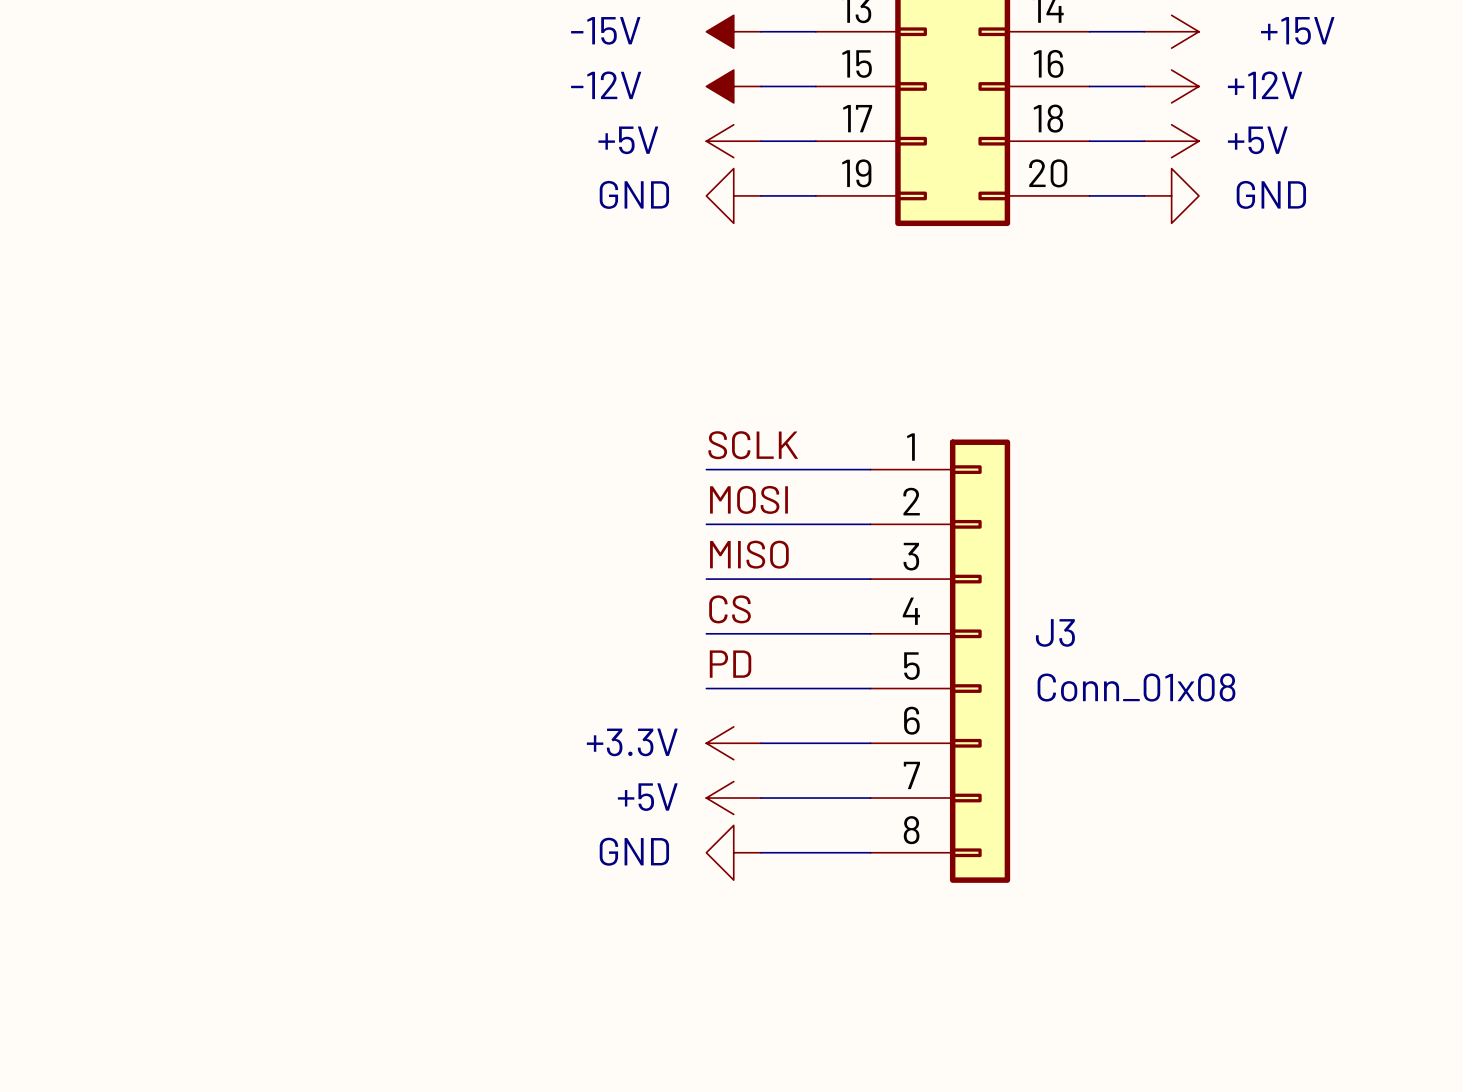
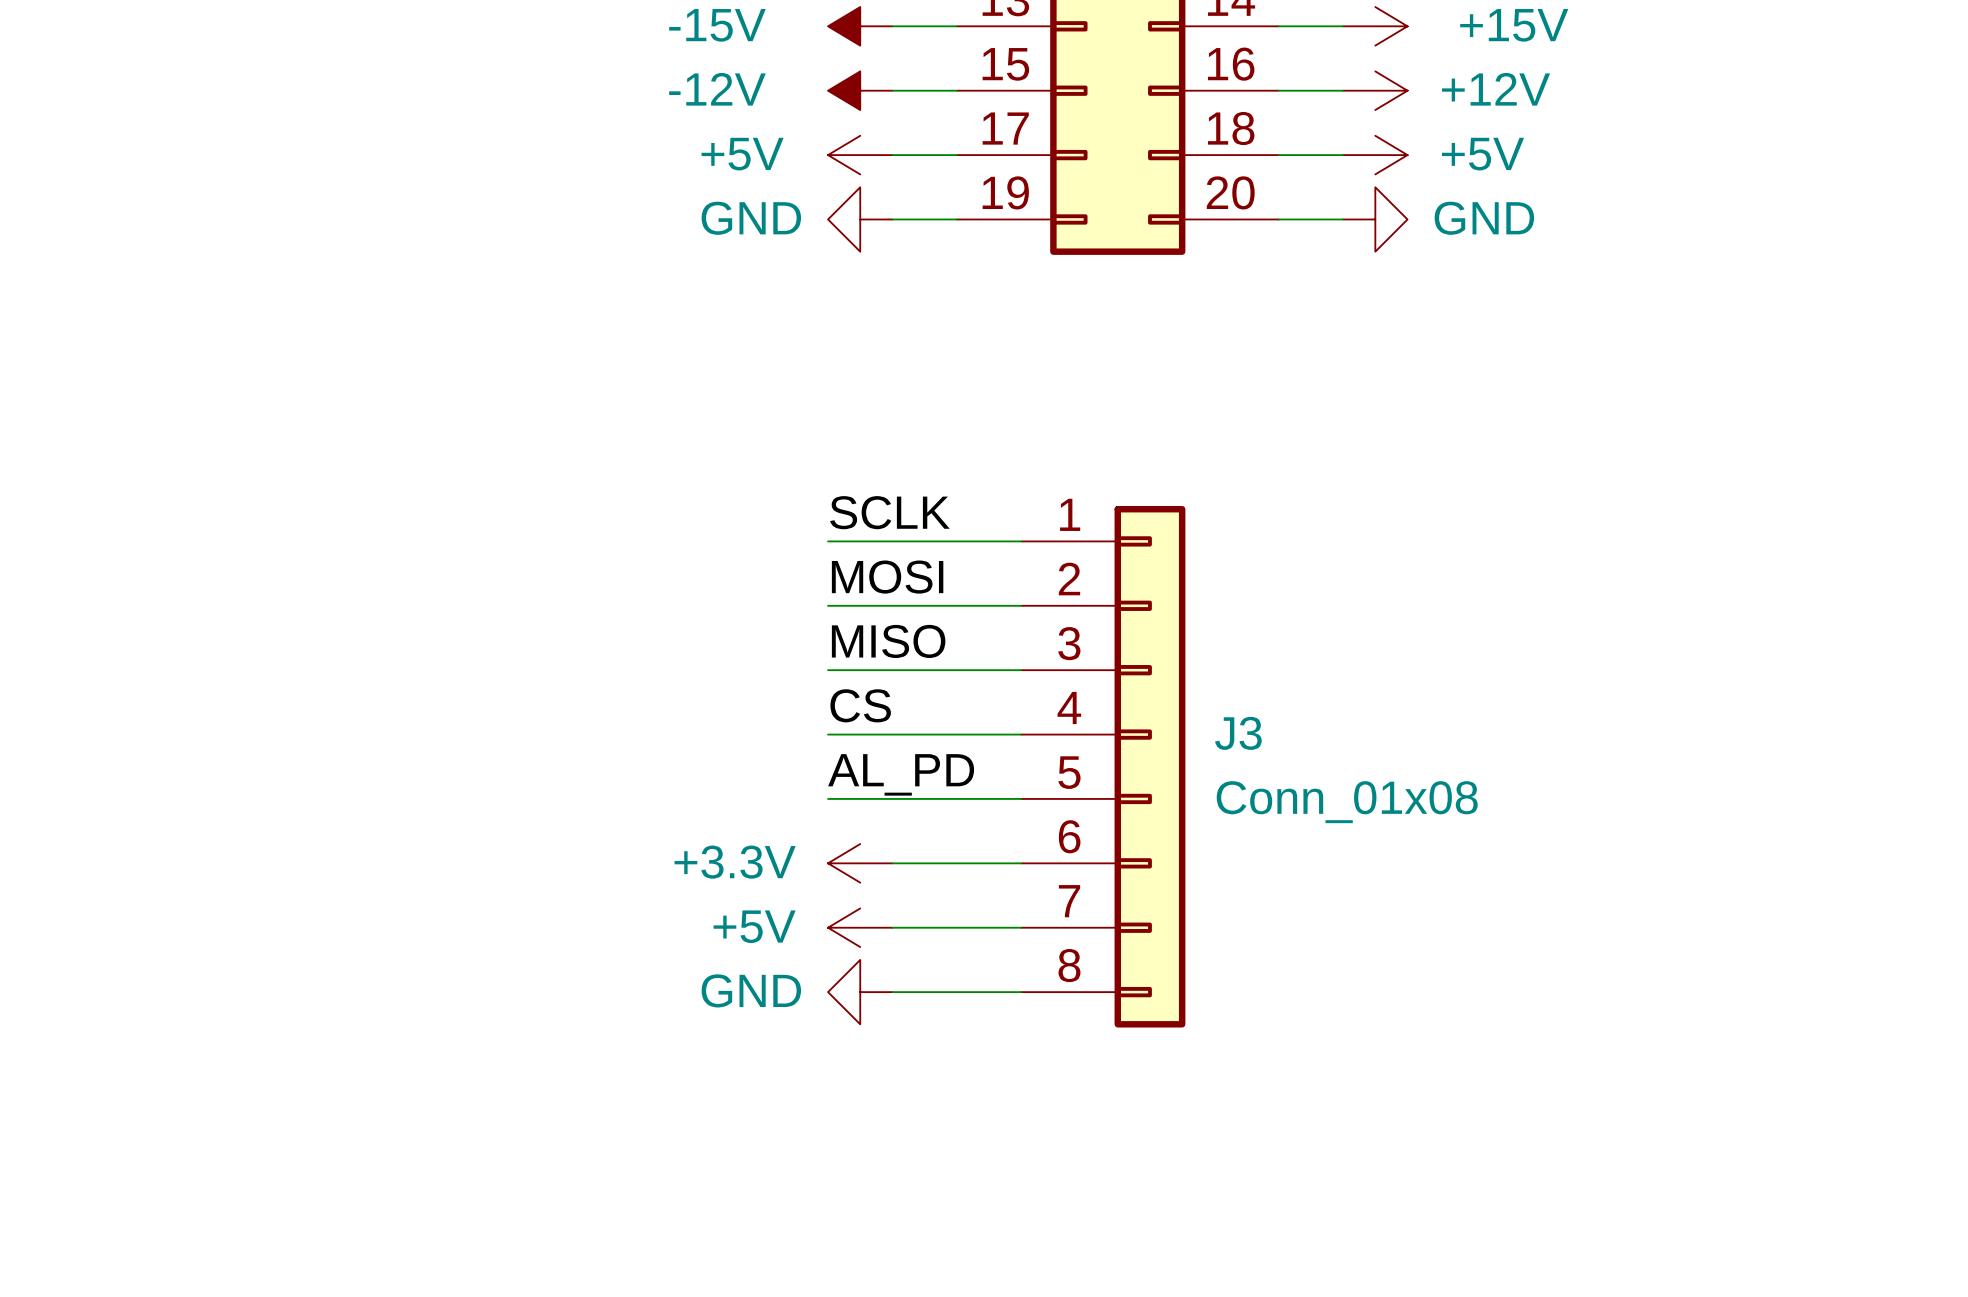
label: PD (730, 664) -> AL_PD (901, 774)

